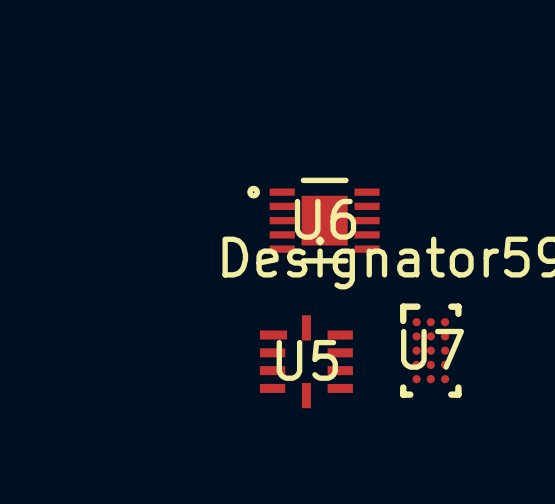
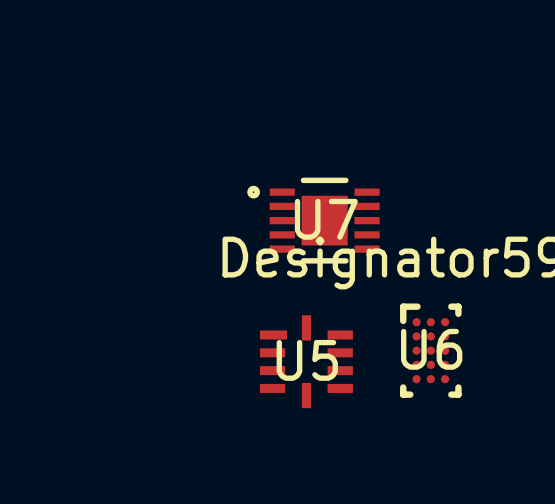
U6 name: U6 (325, 219) -> U7 (326, 219)
U7 name: U7 (432, 349) -> U6 (431, 349)

